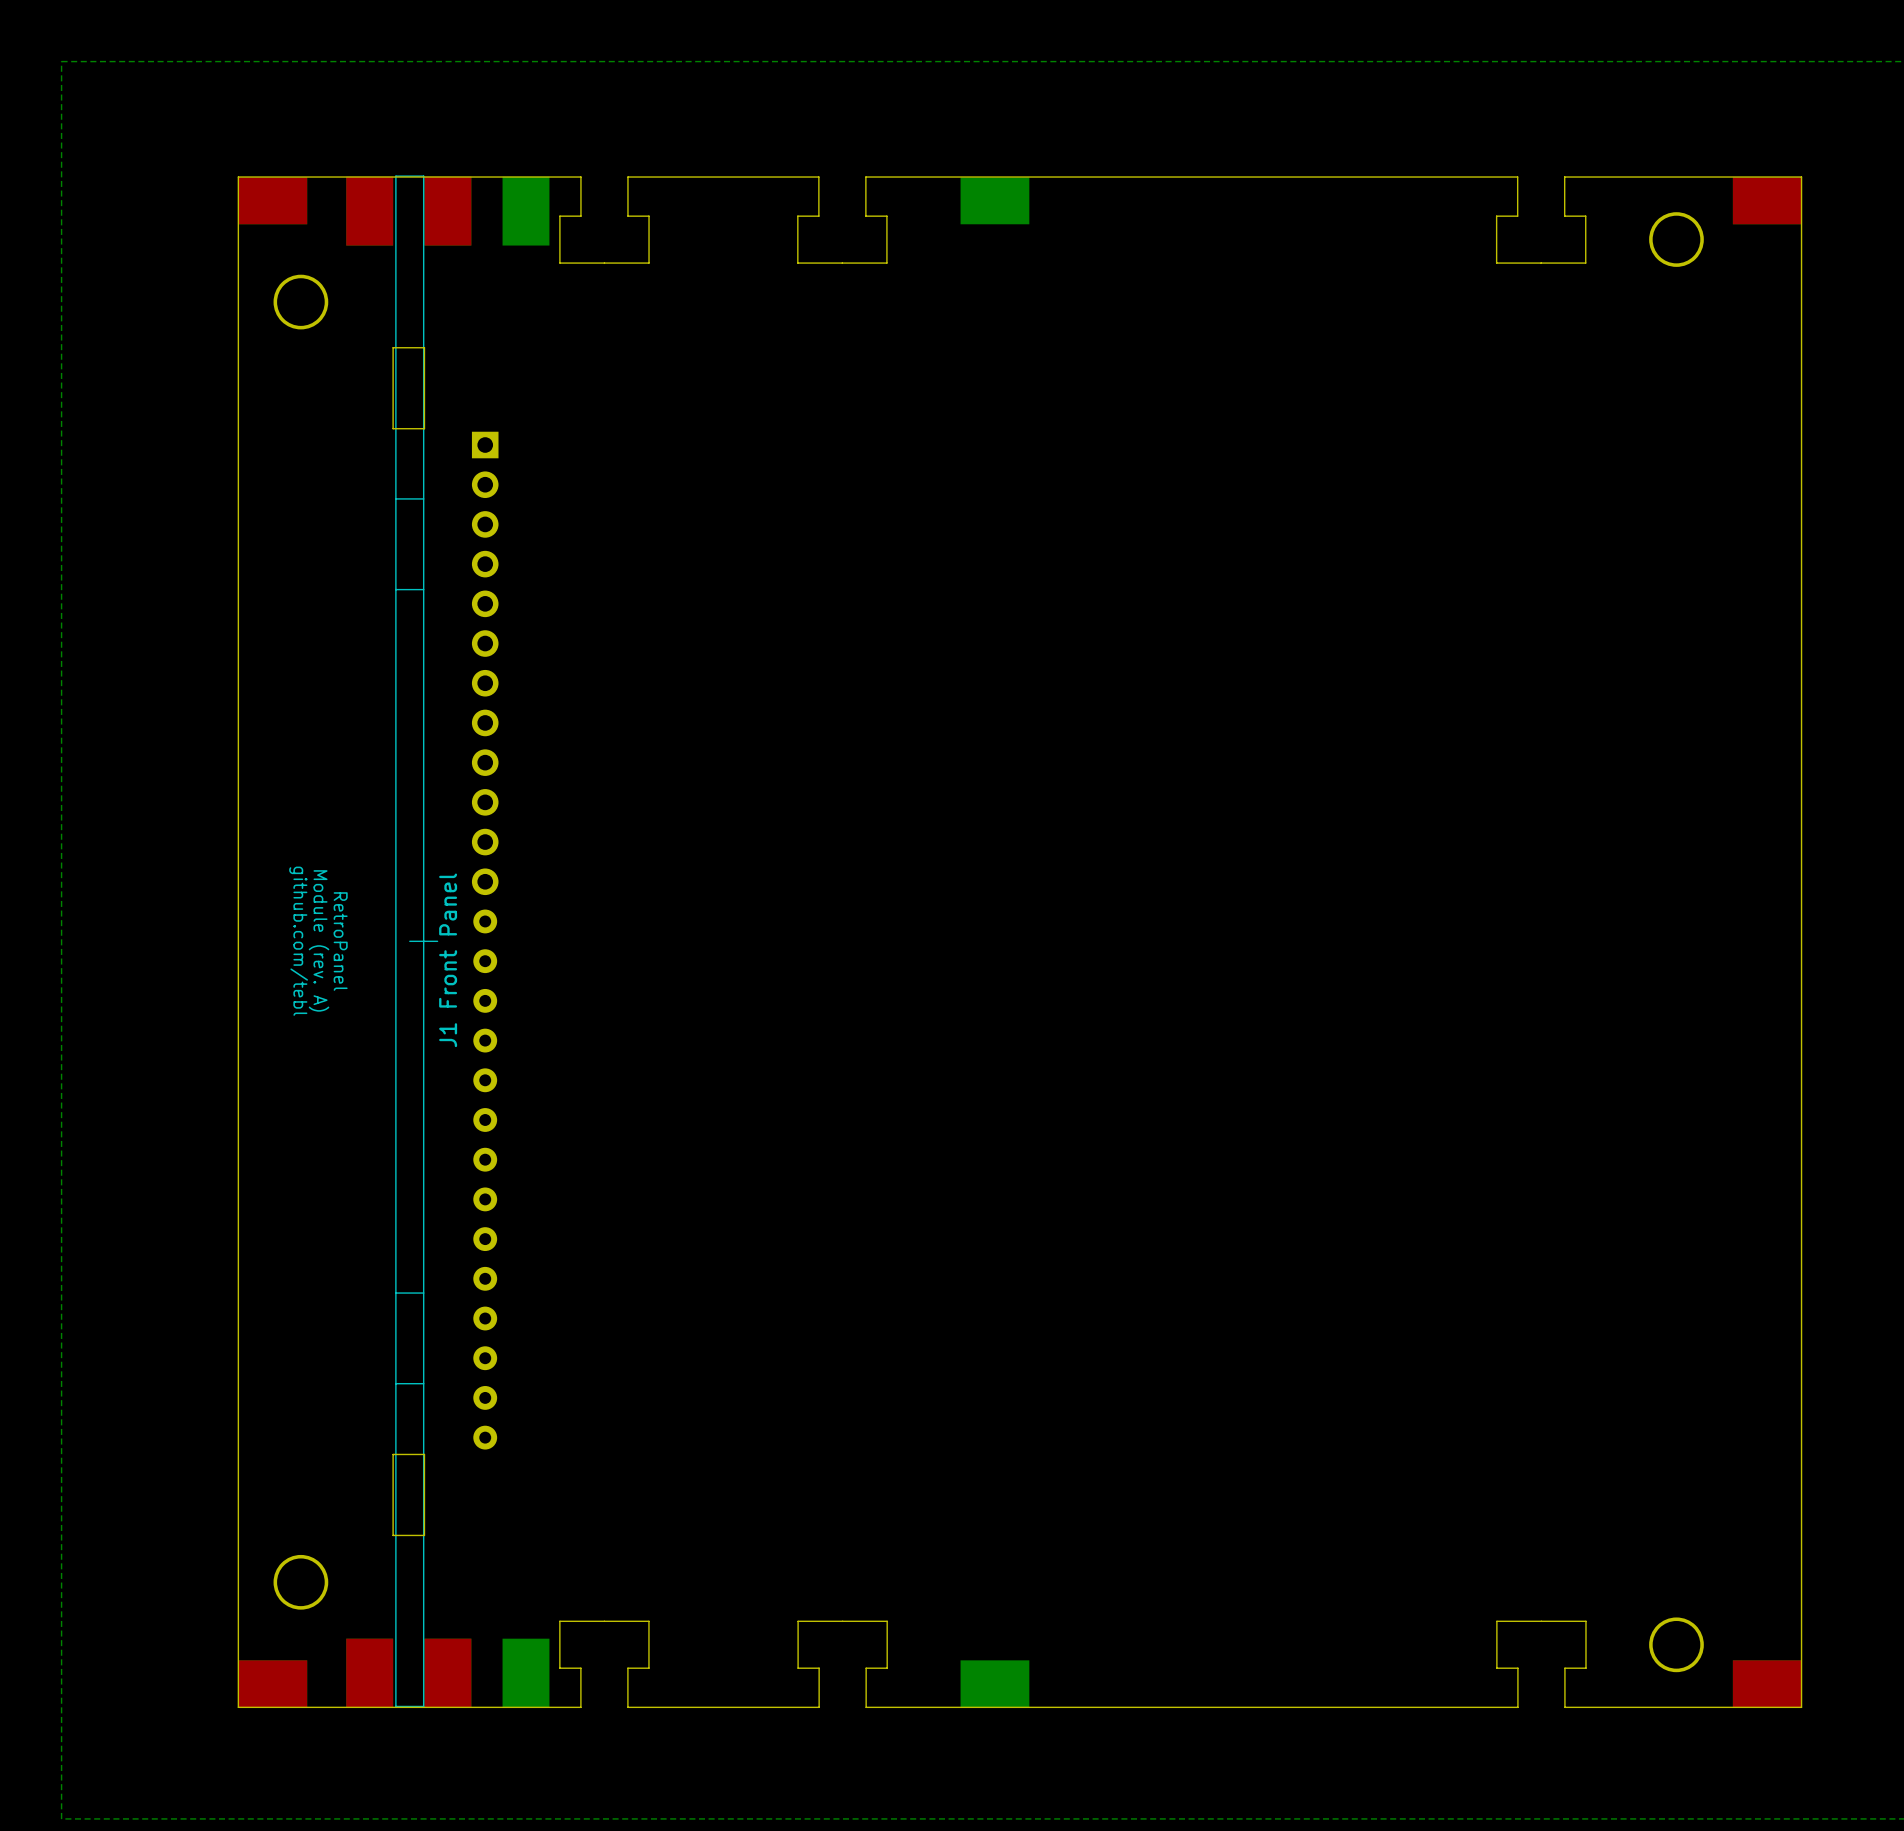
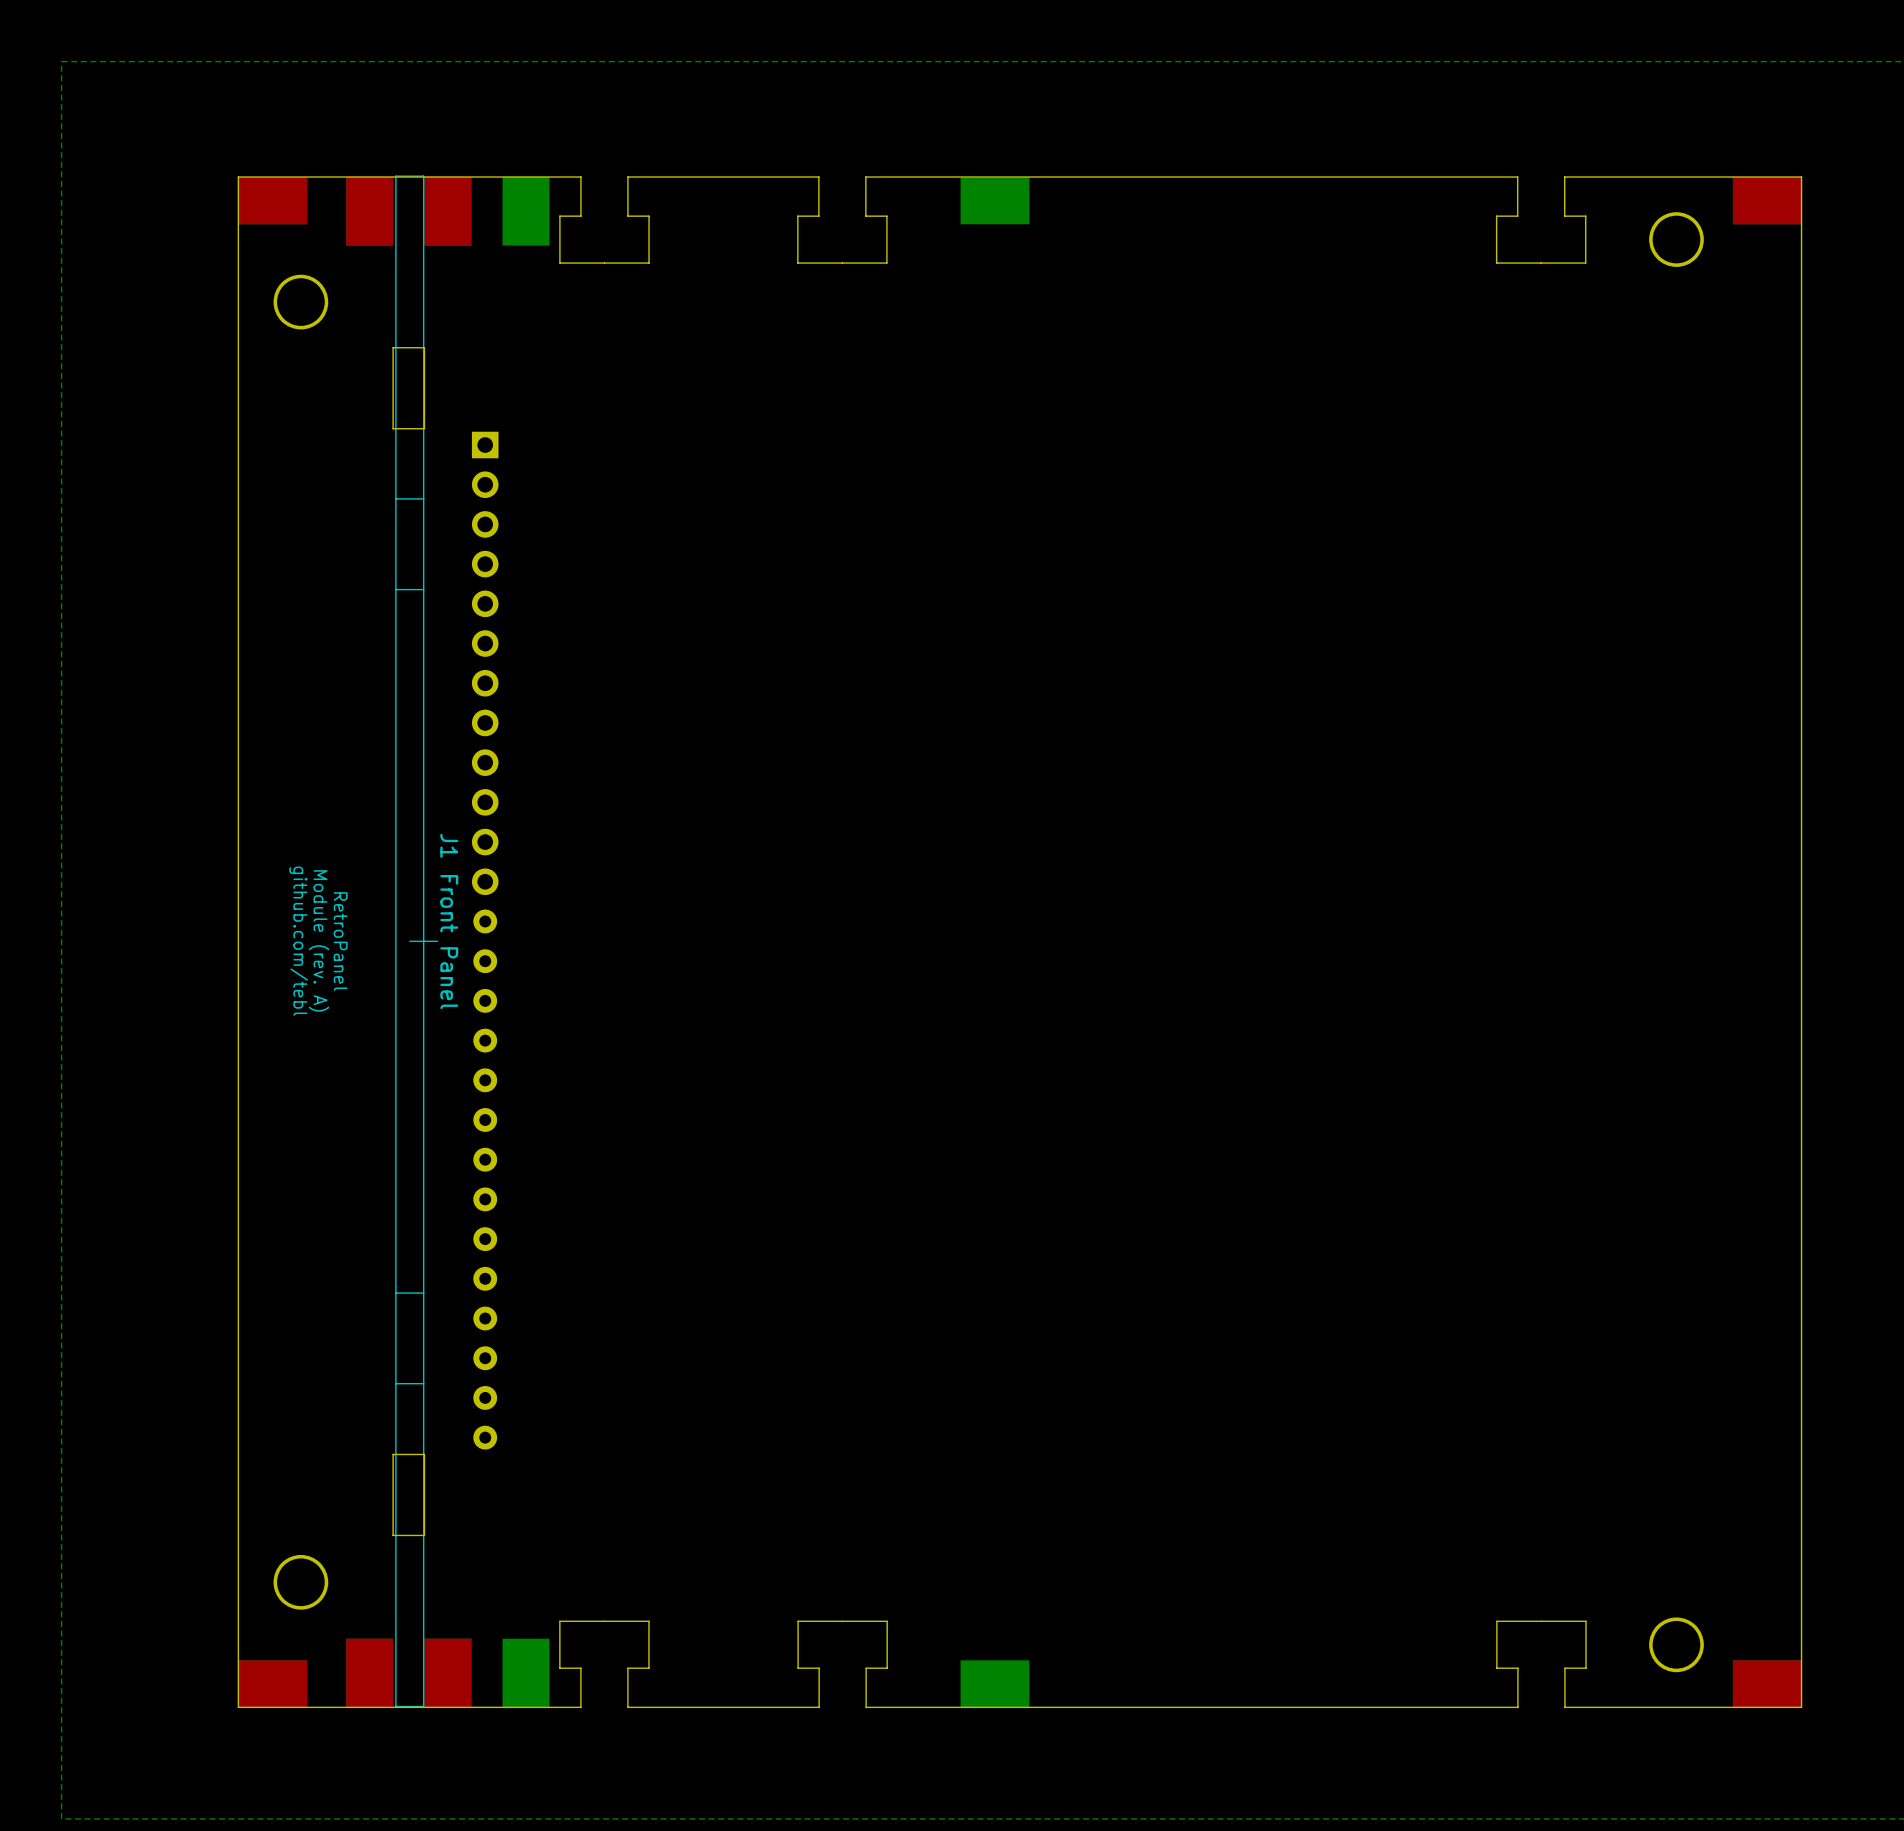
J1 value rotation: 0° (448, 940) -> 180° (449, 942)
J1 name rotation: 0° (448, 1035) -> 180° (449, 845)
J1 name position: J1 (448, 1035) -> J1 (449, 845)

